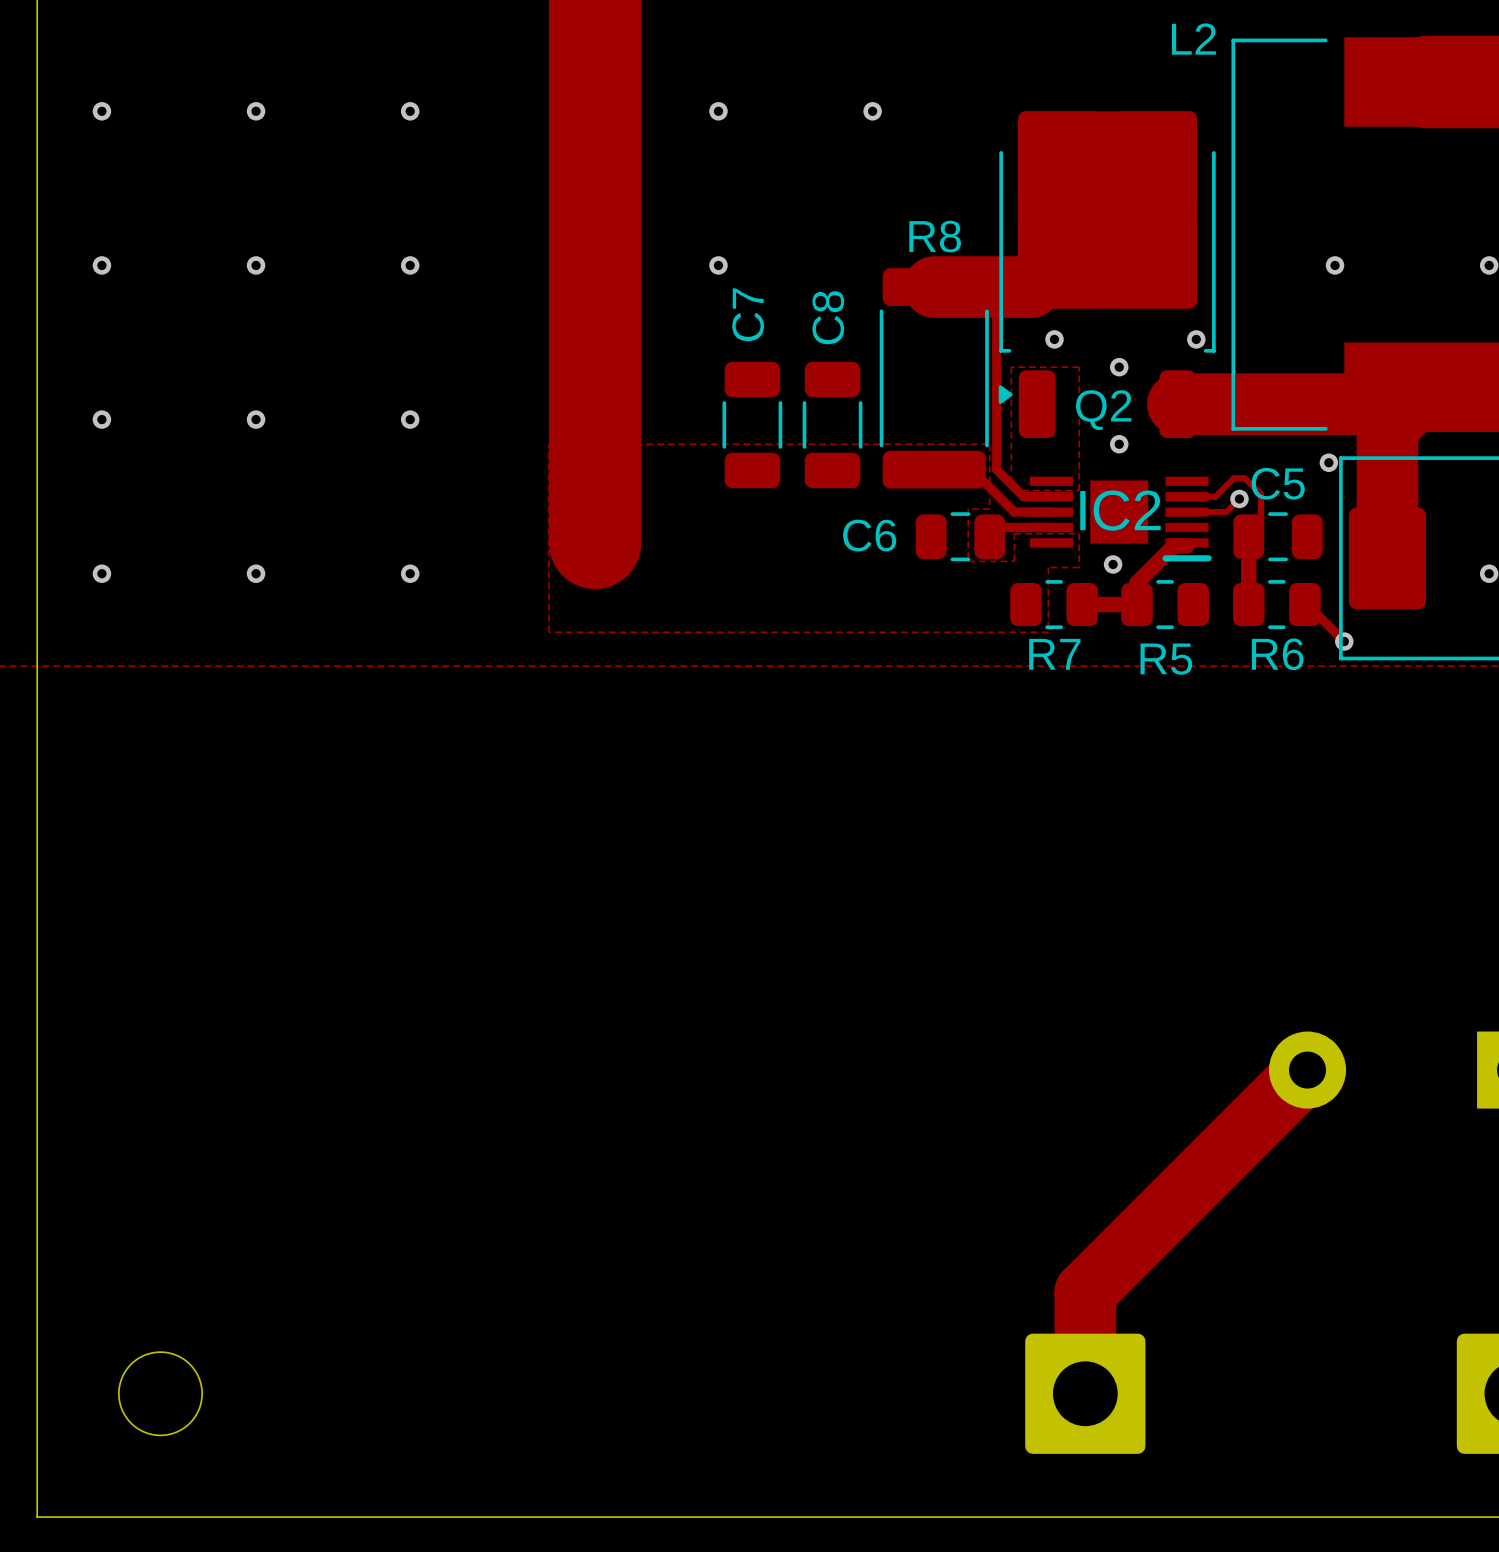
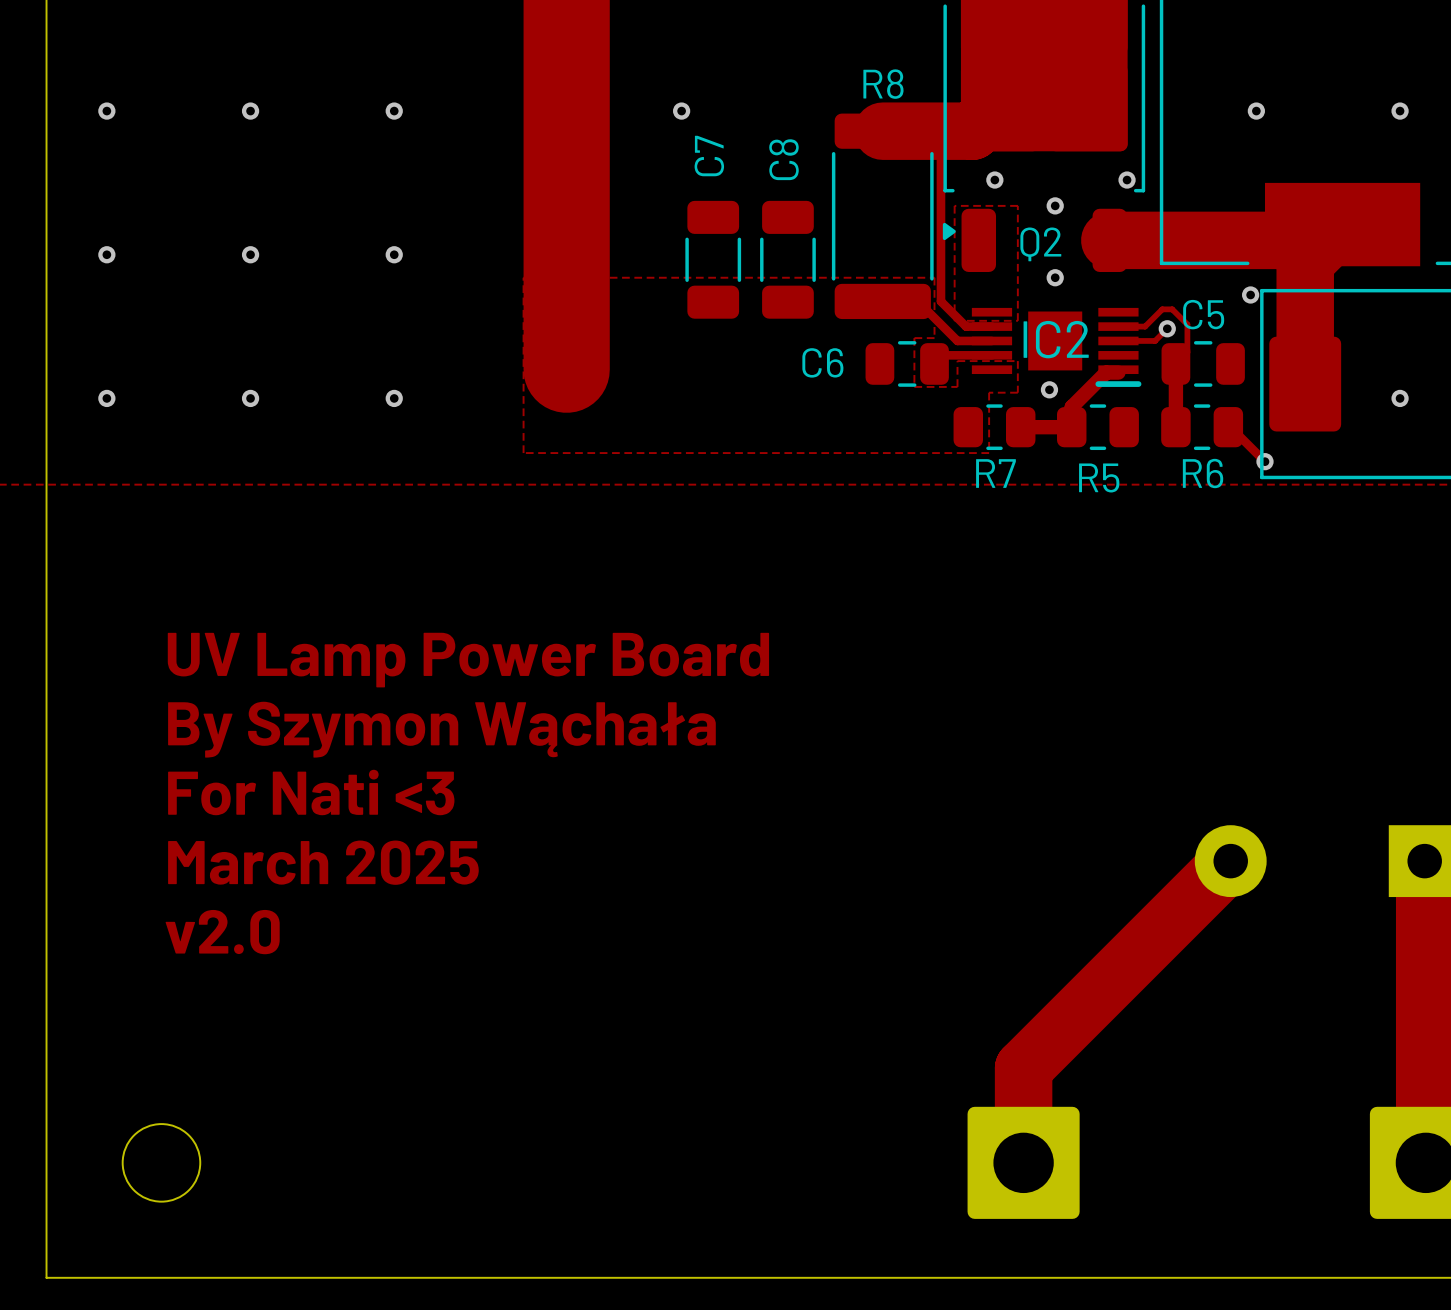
text: none -> UV Lamp Power Board (468, 660)
text: none -> By Szymon Wąchała (441, 729)
text: none -> For Nati <3 (311, 792)
text: none -> March 2025 (323, 862)
text: none -> v2.0 (222, 932)

